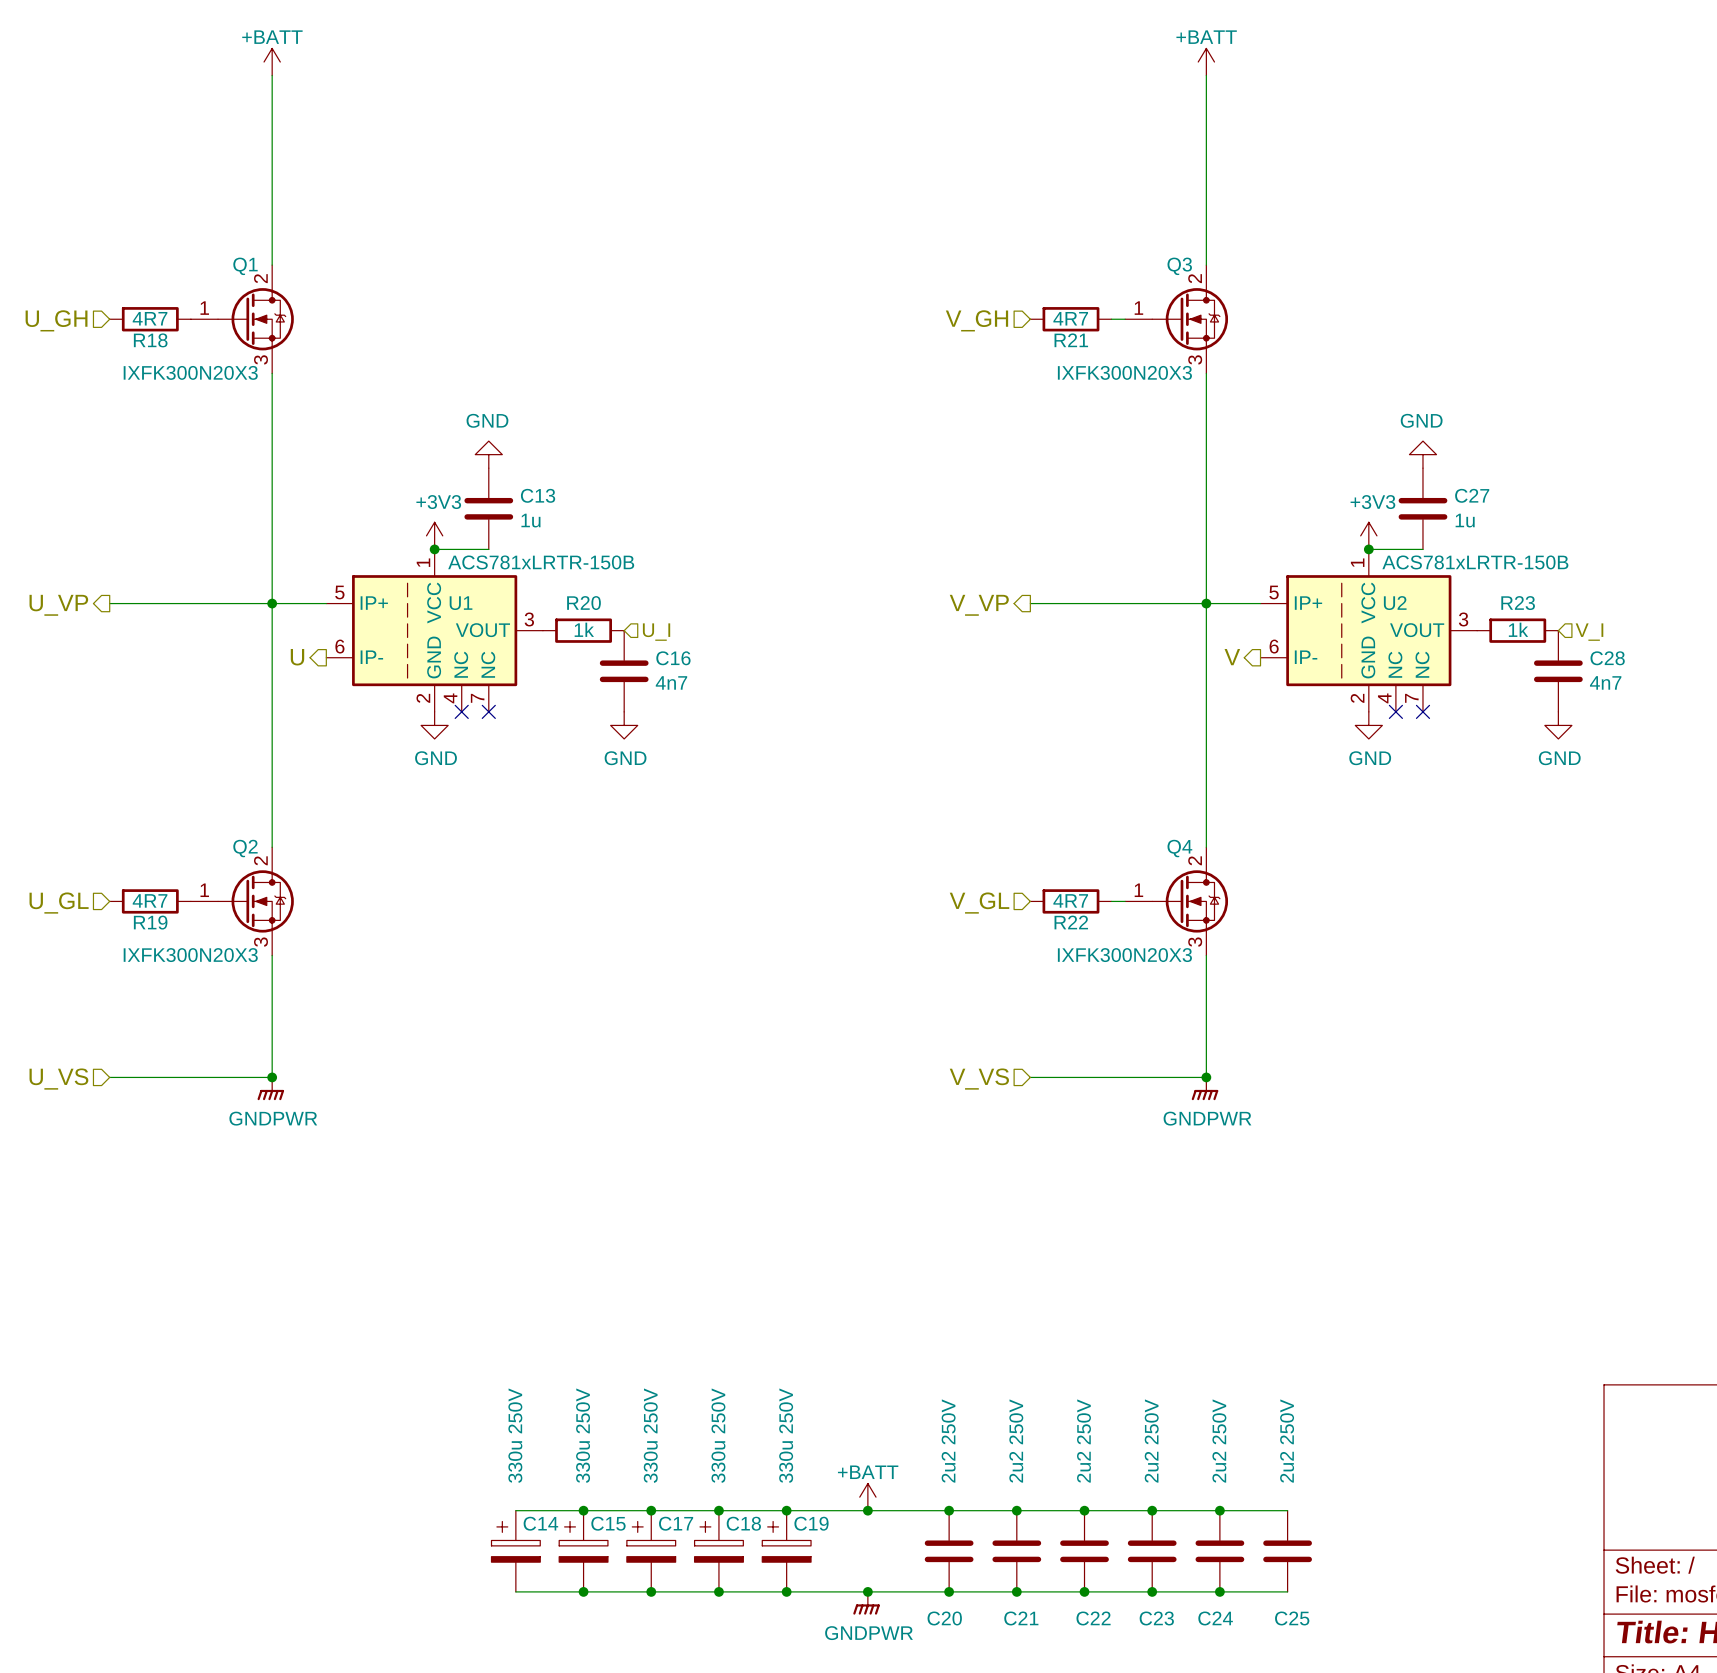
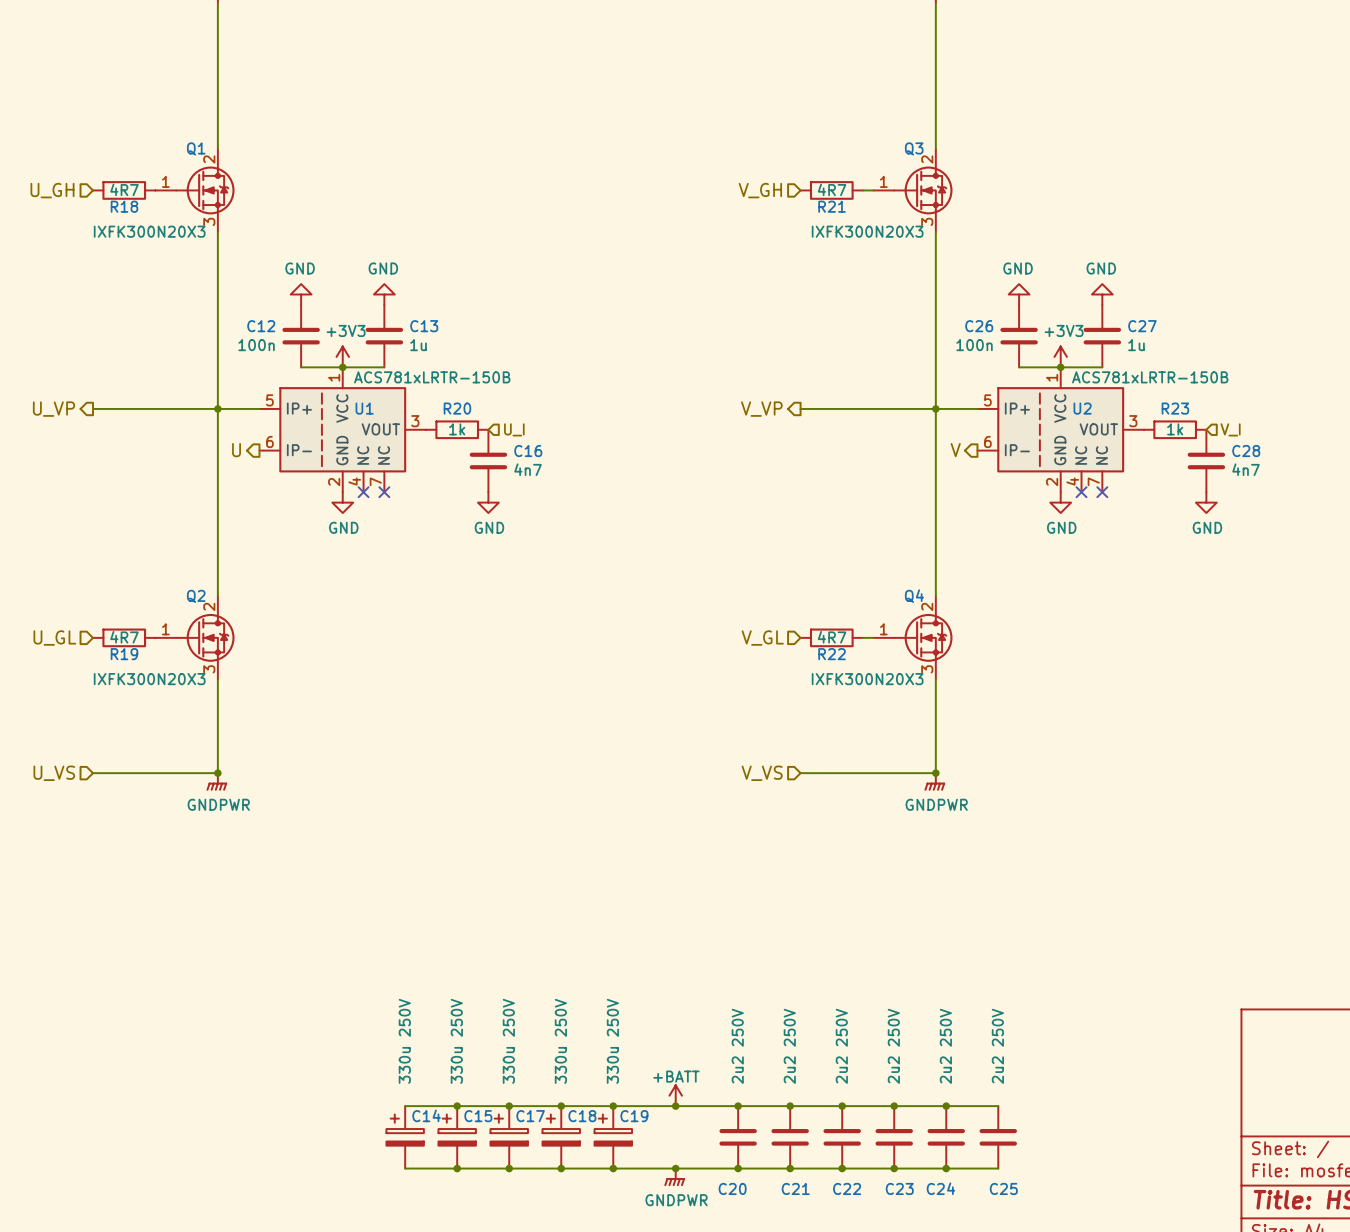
power symbol: none -> GND (301, 294)
power symbol: none -> GND (1019, 294)
C12: none -> 100n (301, 336)
C26: none -> 100n (1019, 336)
wire: none -> (301, 367) (342, 367)
wire: none -> (1019, 367) (1060, 367)

